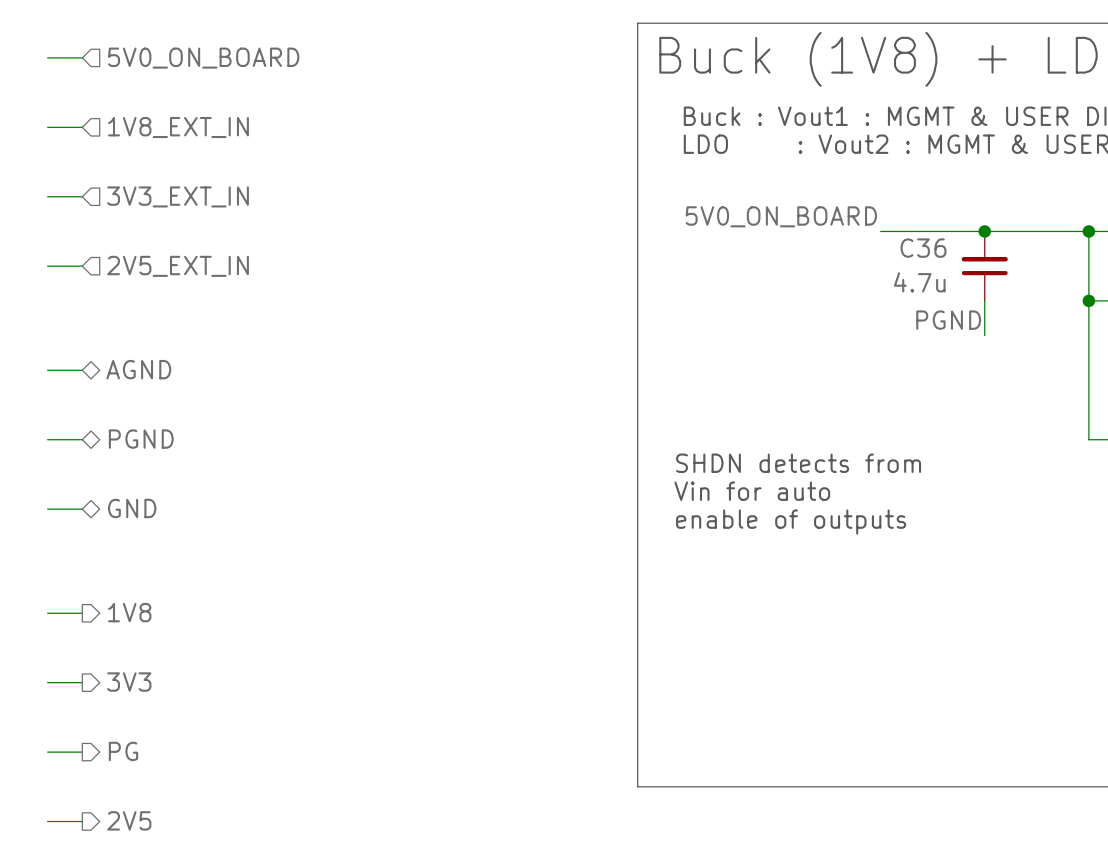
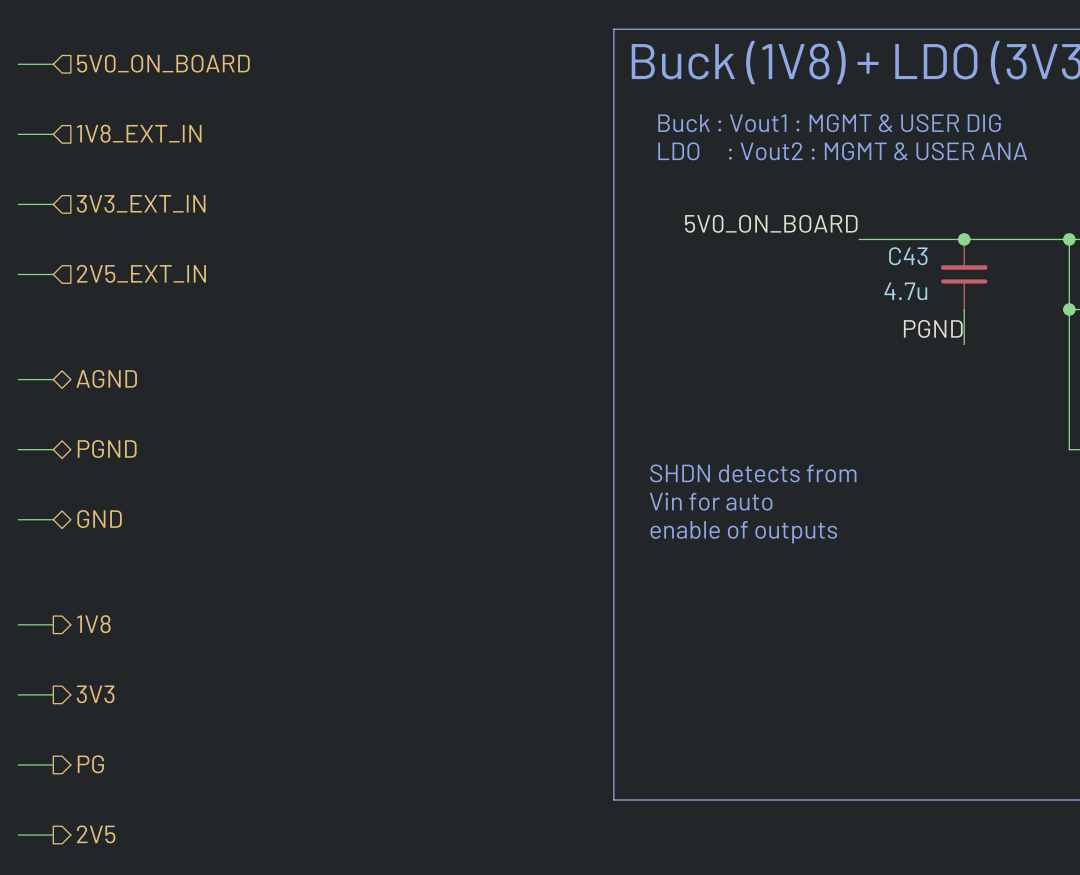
C36 name: C36 (923, 248) -> C43 (908, 256)

